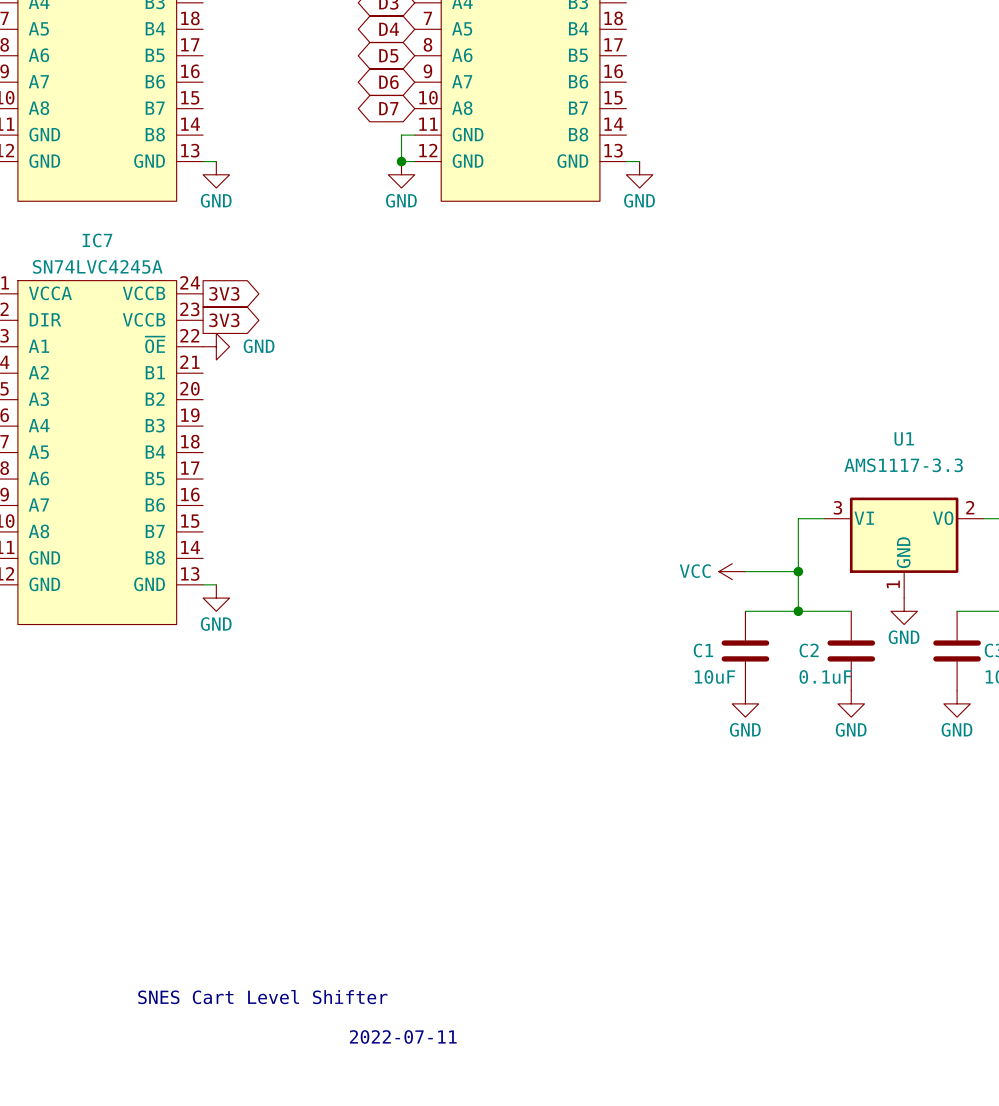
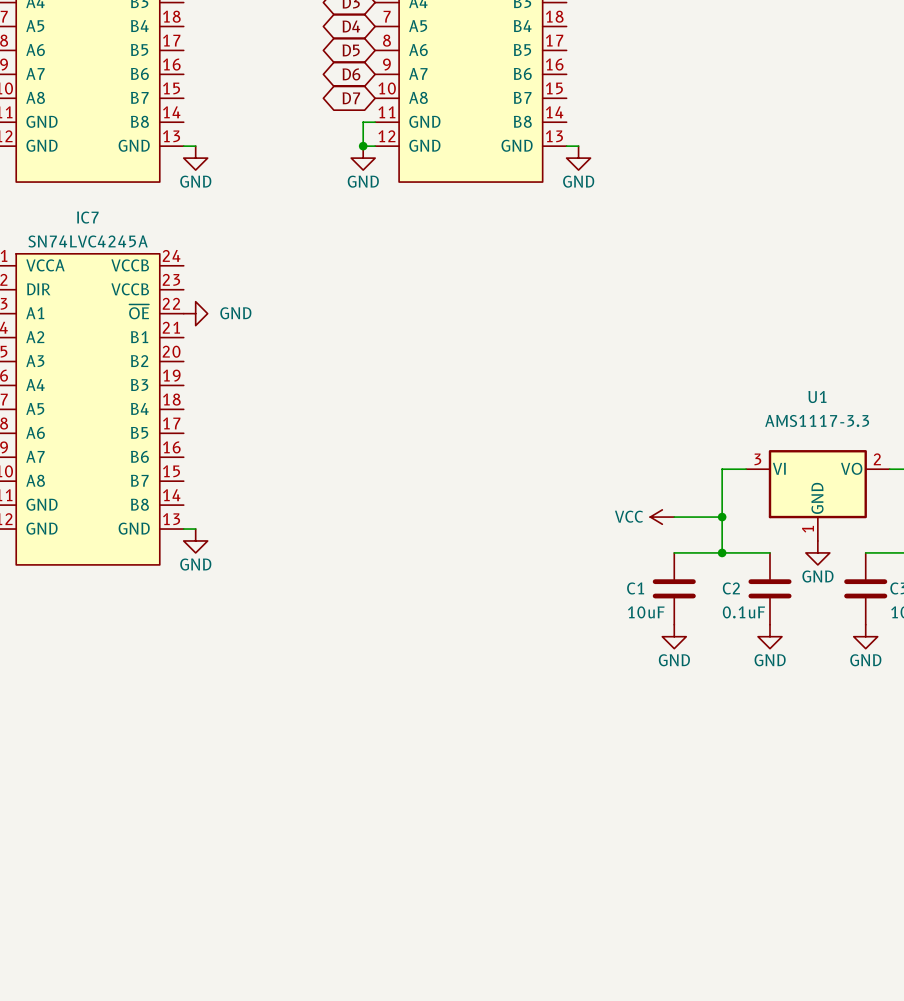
global label: 3V3 (224, 293) -> none
global label: 3V3 (224, 320) -> none
text: SNES Cart Level Shifter (262, 997) -> none
text: 2022-07-11 (403, 1036) -> none

